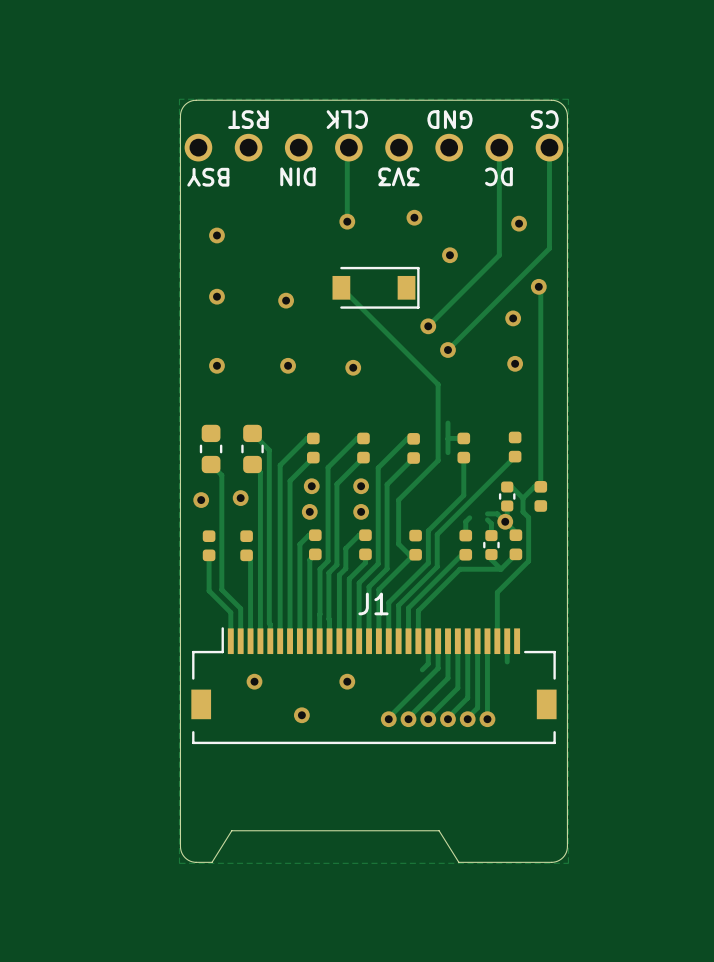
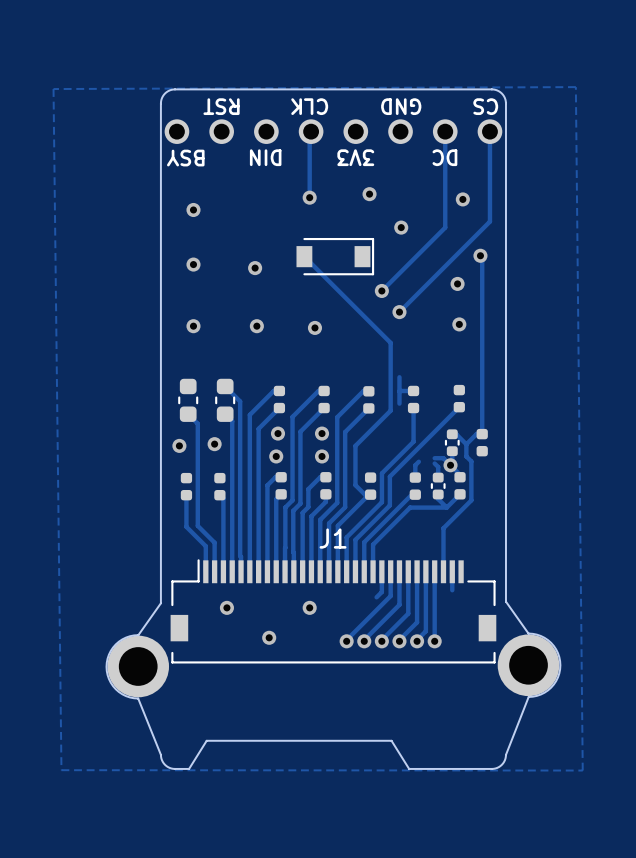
zone outline: (568, 99) (568, 863) (179, 863) (179, 99) (568, 99) -> (575, 87) (582, 770) (61, 770) (53, 89) (575, 87)
board edge: (567, 674) (567, 846) -> (528, 633) (540, 635) (551, 642) (559, 657) (560, 669) (556, 681) (547, 690) (536, 695) (528, 696) (505, 754)
board edge: none -> (505, 601) (528, 633)
board edge: (180, 676) (180, 846) -> (138, 635) (126, 637) (113, 647) (107, 658) (106, 670) (110, 682) (118, 691) (130, 697) (138, 698) (160, 754)
board edge: none -> (160, 603) (138, 635)
part: none -> (528, 665)
part: none -> (138, 666)

